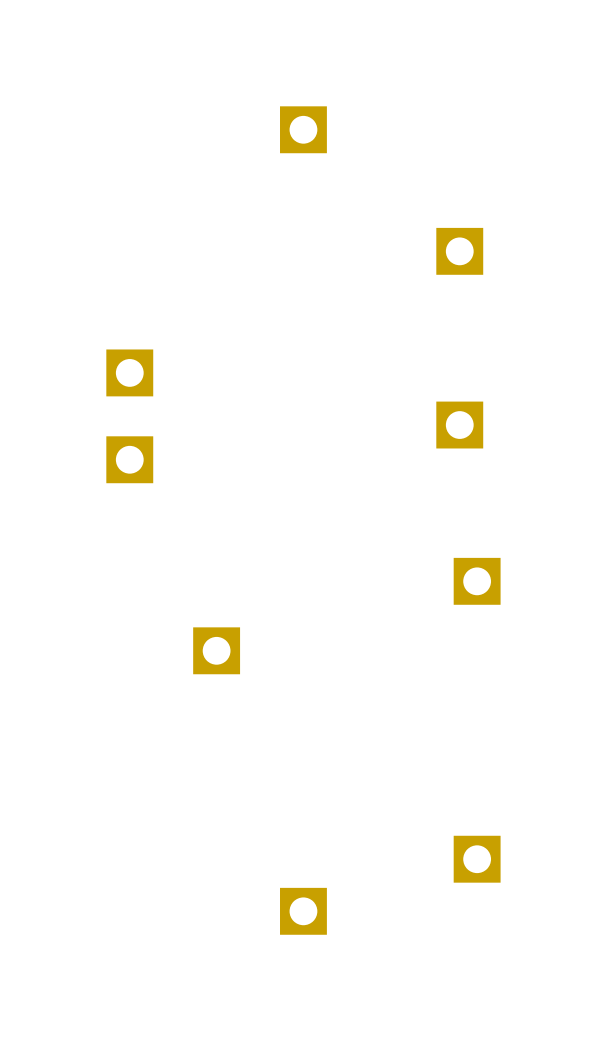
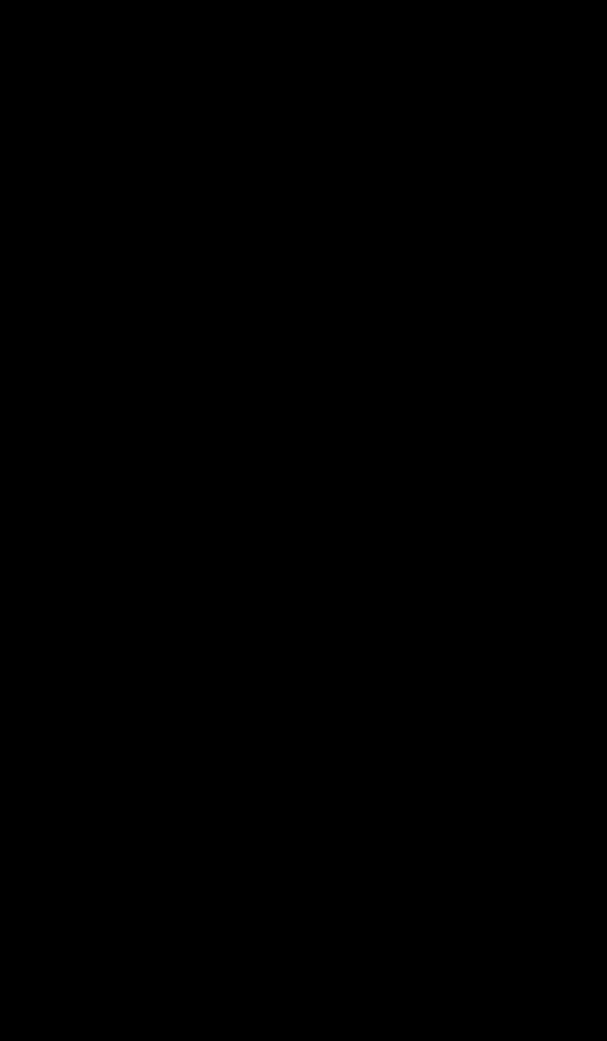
part: (303, 129) -> none
part: (459, 251) -> none
part: (129, 372) -> none
part: (459, 425) -> none
part: (129, 459) -> none
part: (477, 581) -> none
part: (216, 650) -> none
part: (477, 859) -> none
part: (303, 911) -> none

